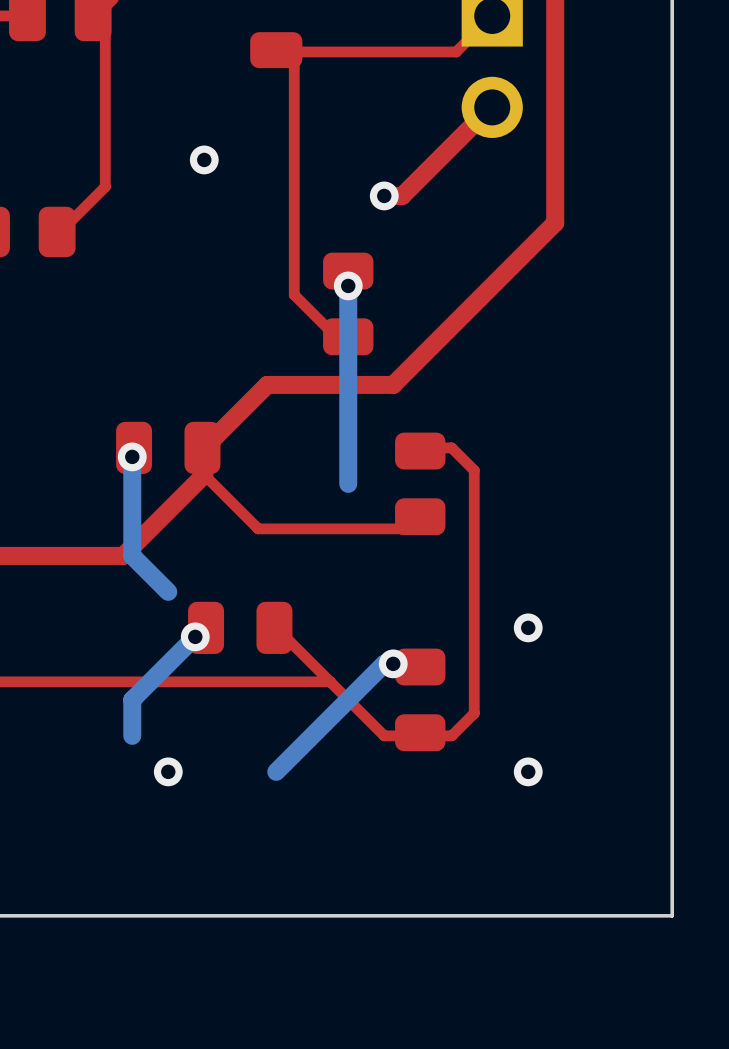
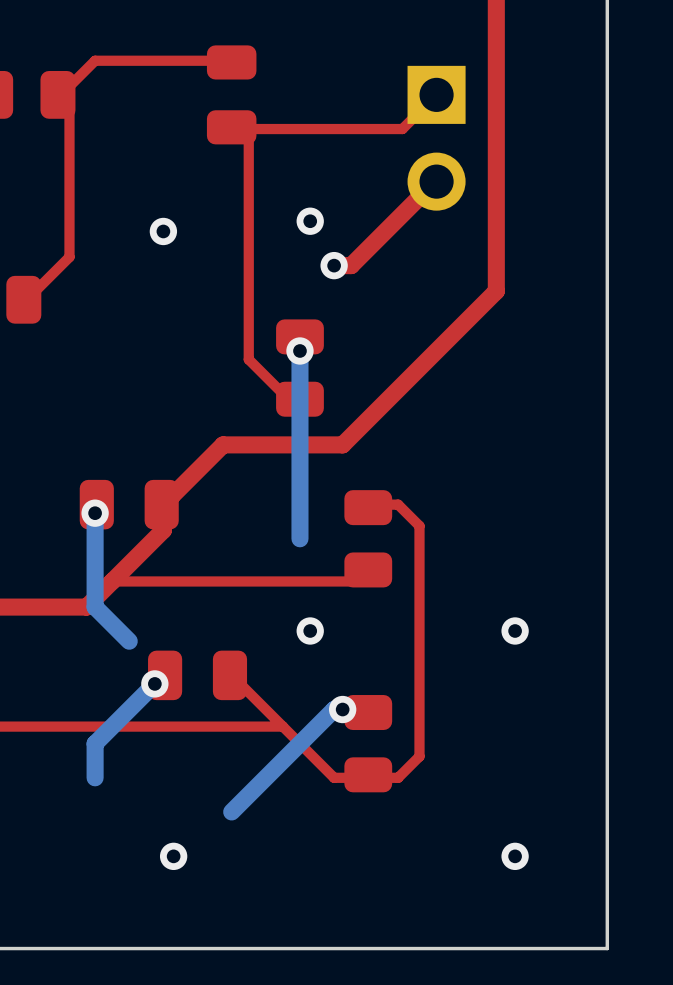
via: none -> (310, 221)
top track: (204, 474) (258, 528) -> (112, 581) (214, 581)
via: none -> (310, 630)
via position: (528, 627) -> (515, 630)
via position: (168, 771) -> (173, 856)
via position: (528, 771) -> (515, 856)

